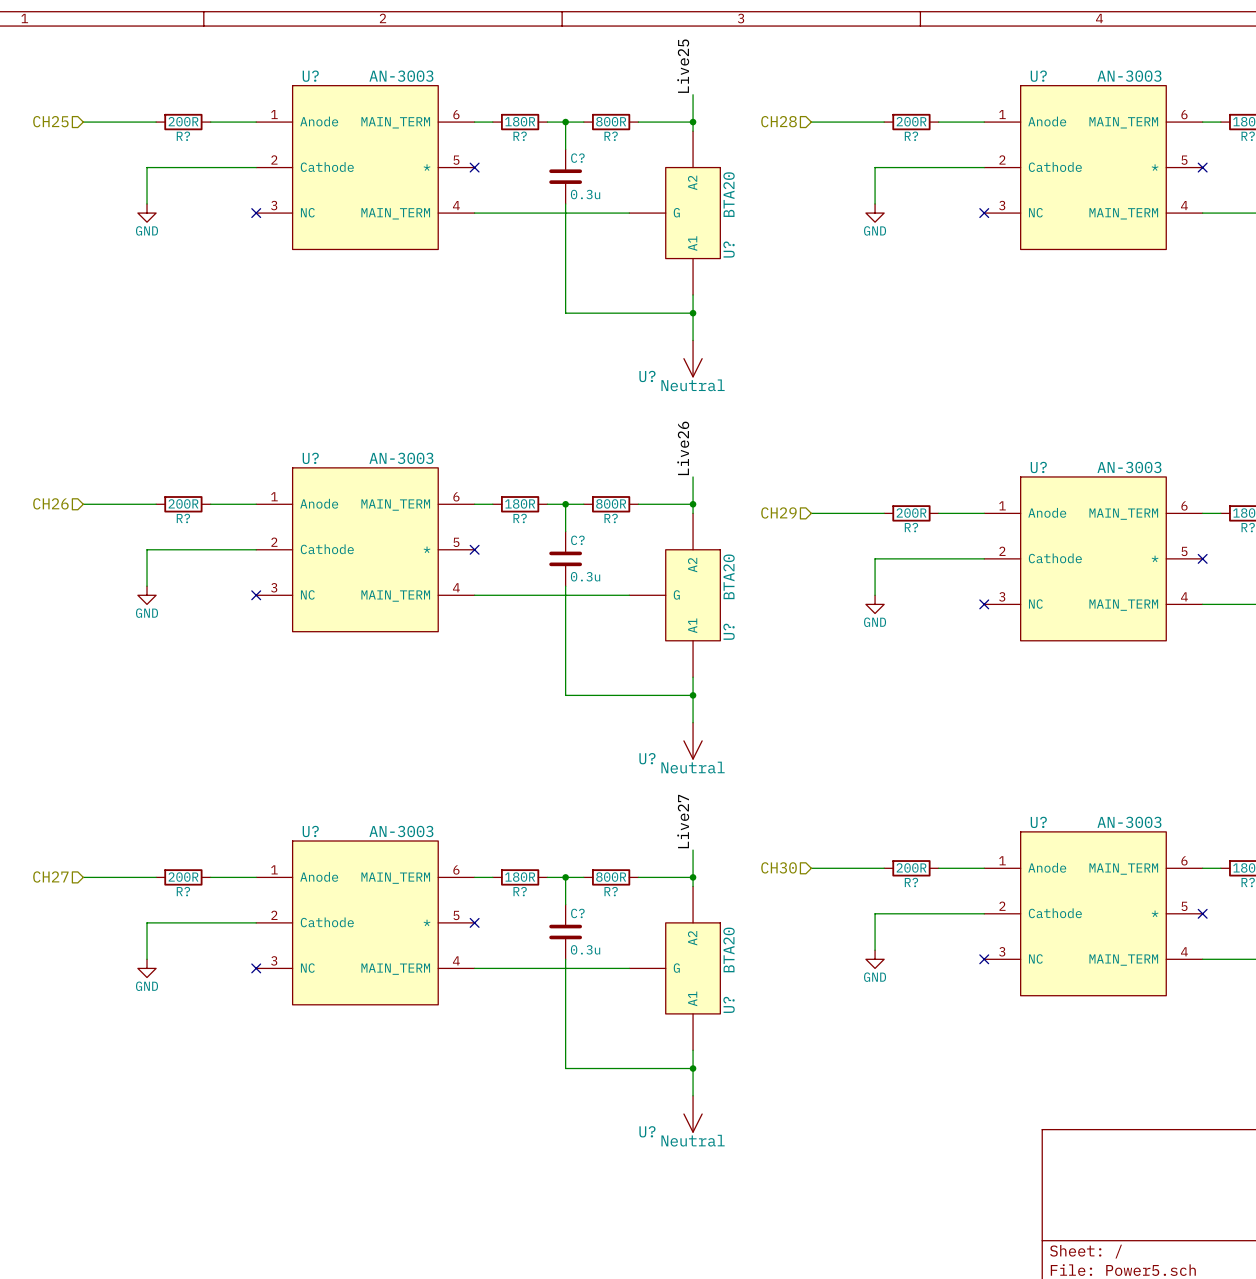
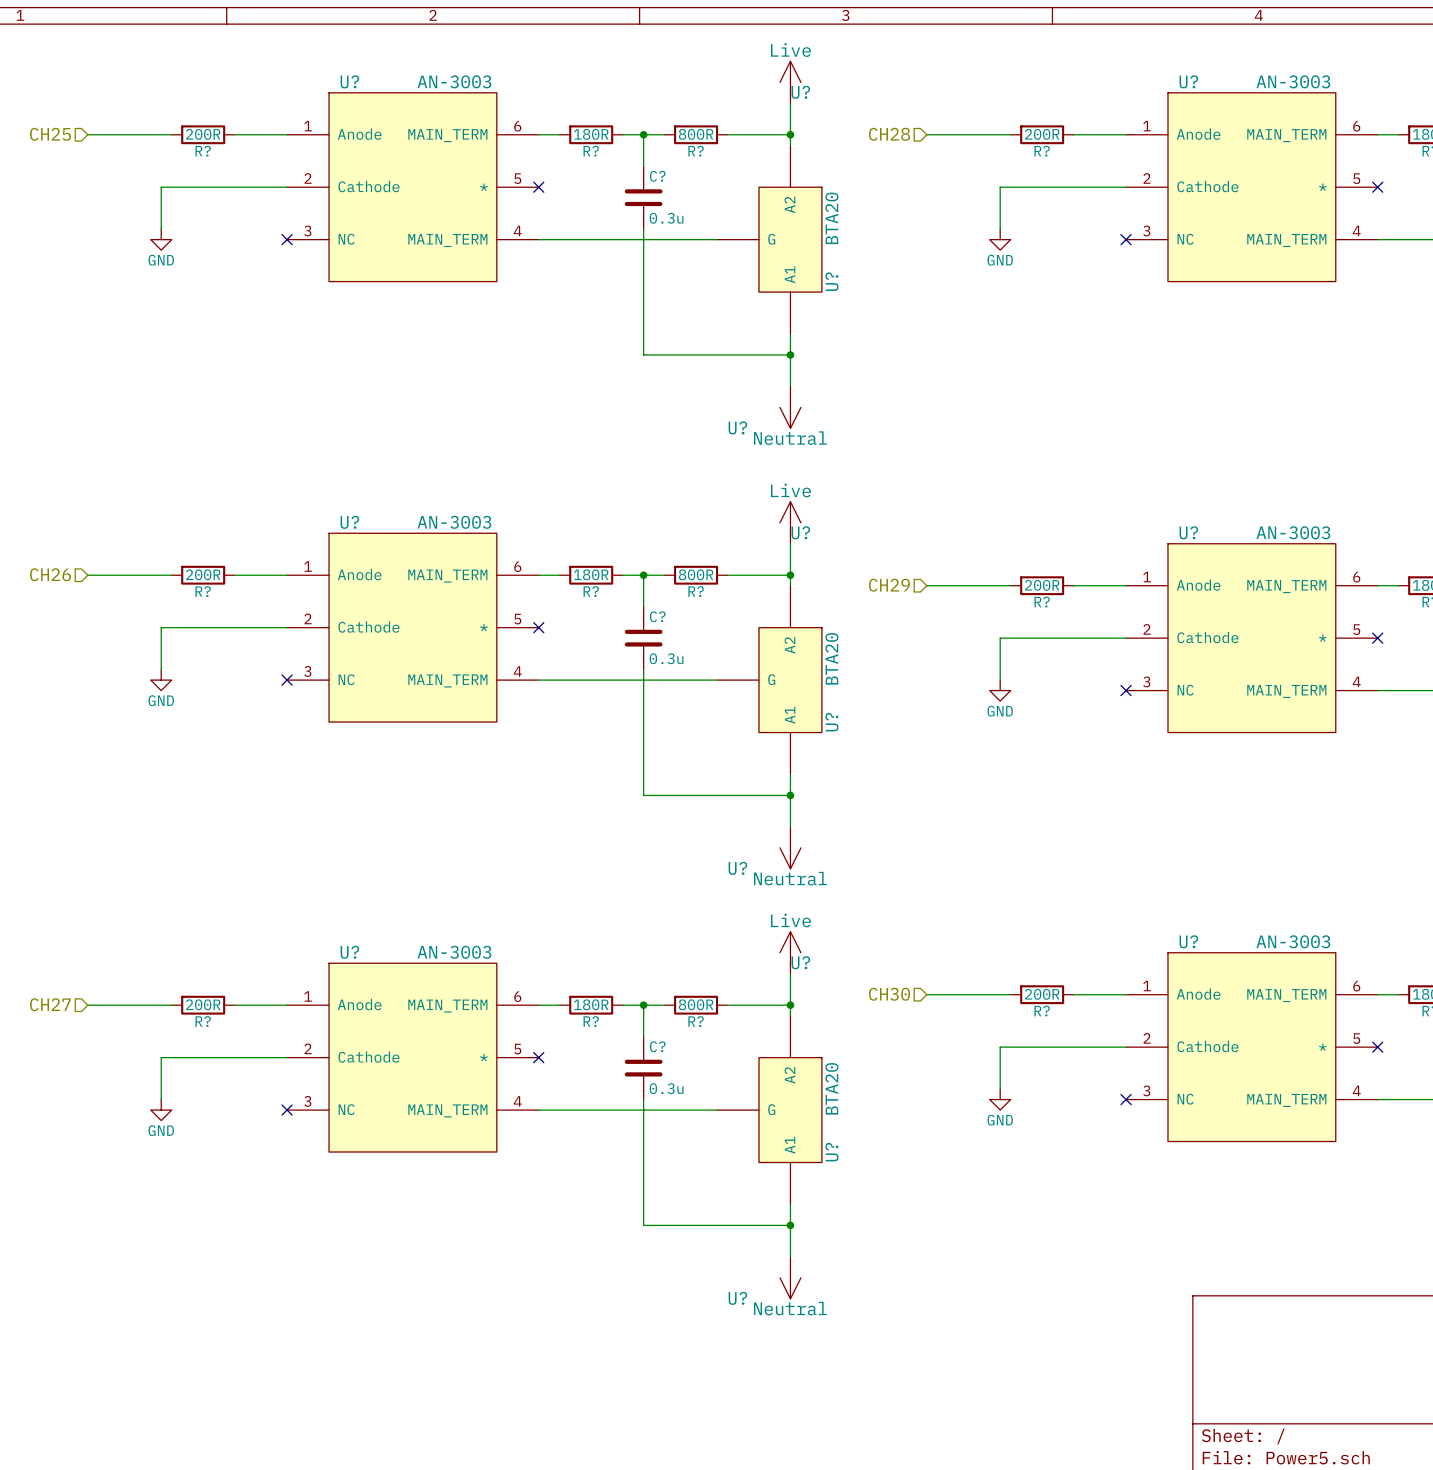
label: Live25 (683, 66) -> none
U?: none -> Live (790, 82)
label: Live26 (683, 448) -> none
U?: none -> Live (790, 522)
label: Live27 (683, 821) -> none
U?: none -> Live (790, 952)

